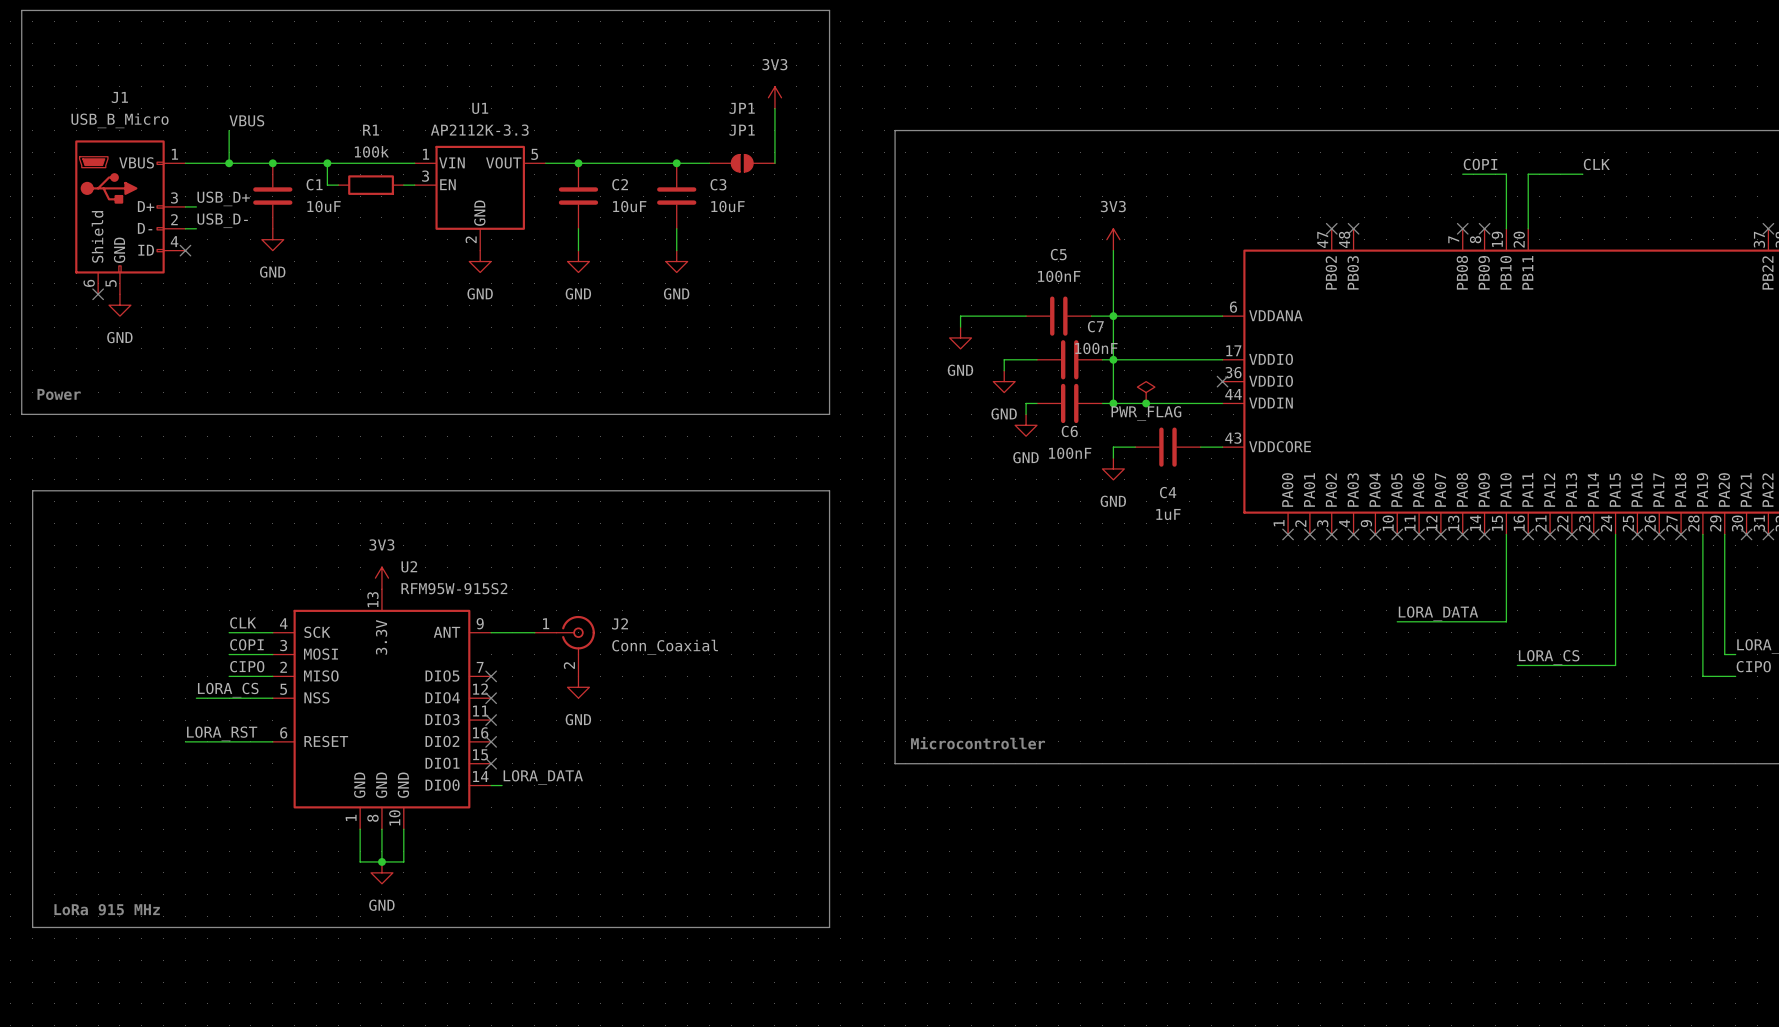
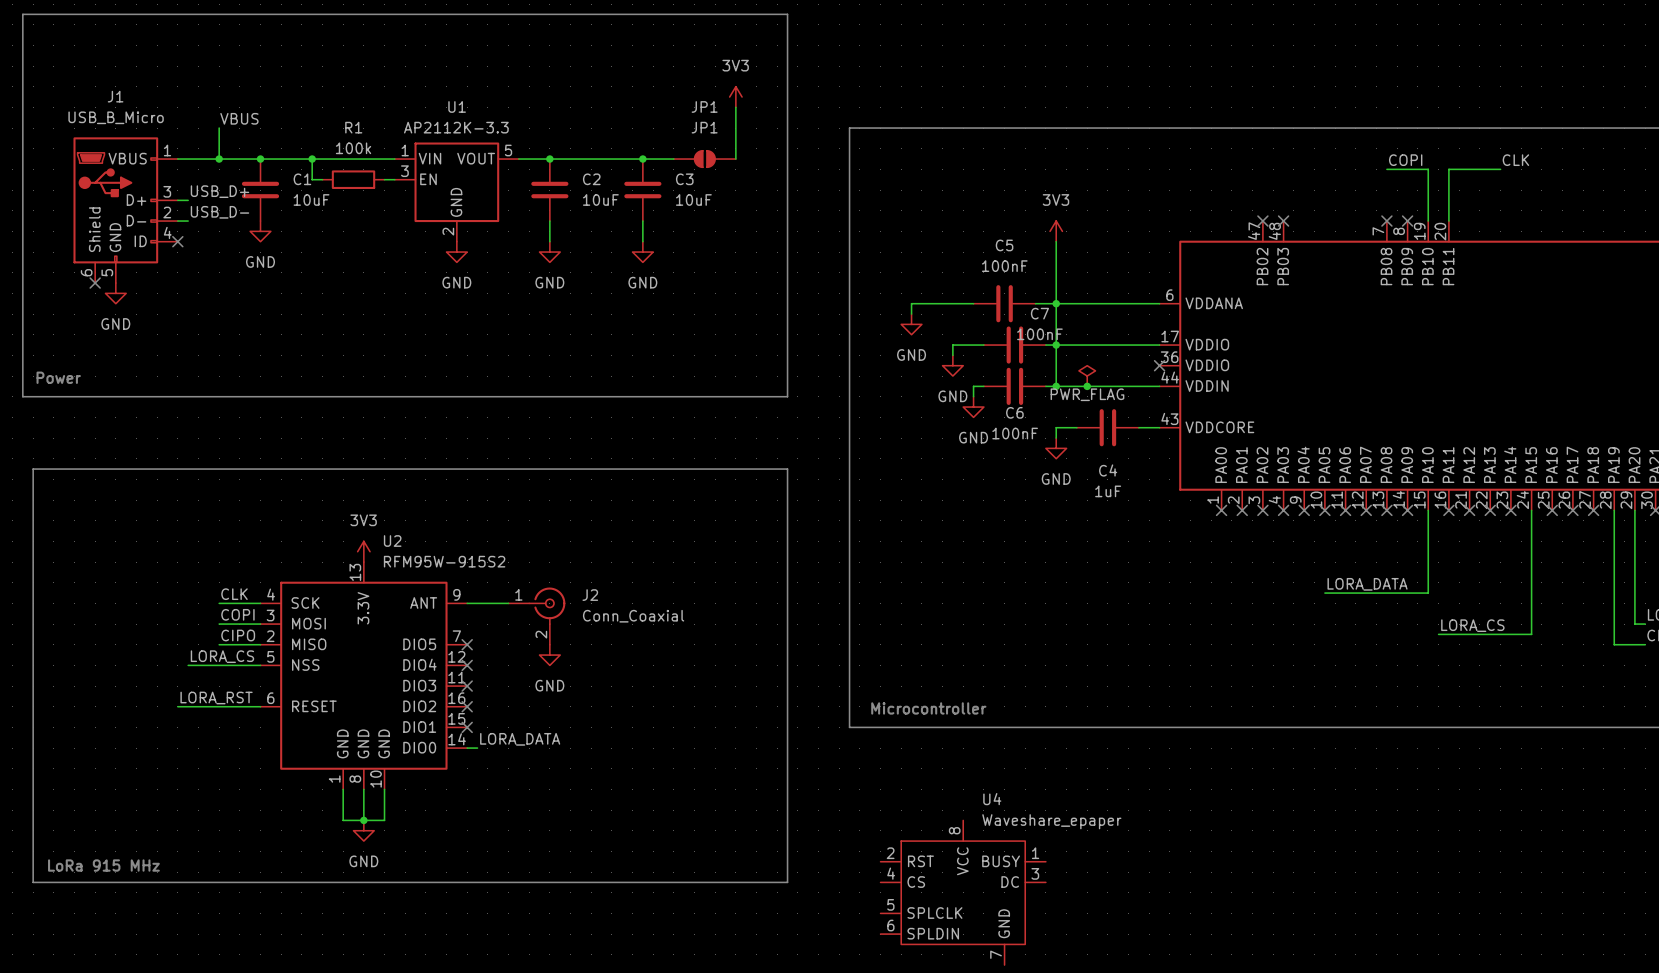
U4: none -> Waveshare_epaper (963, 892)

